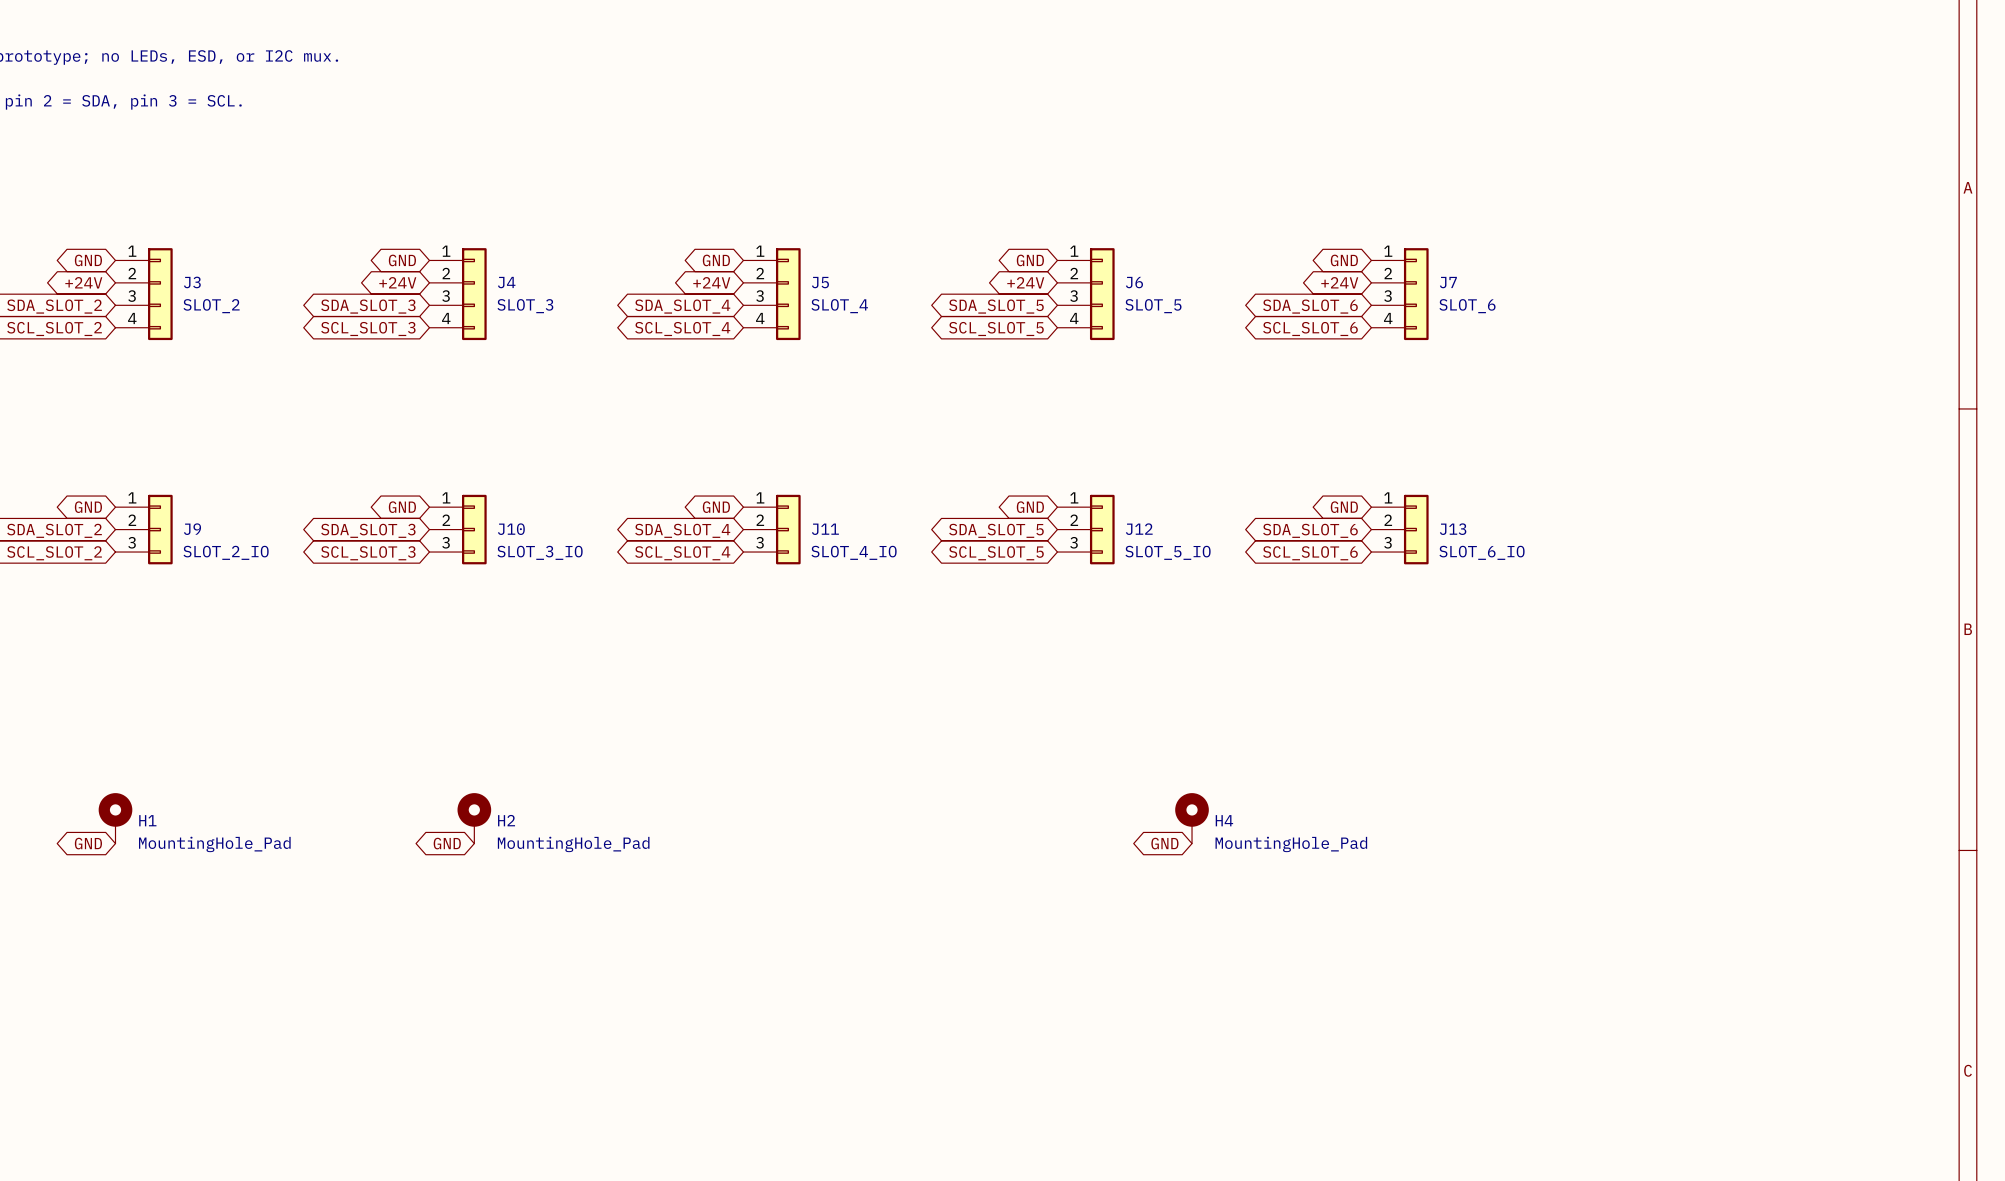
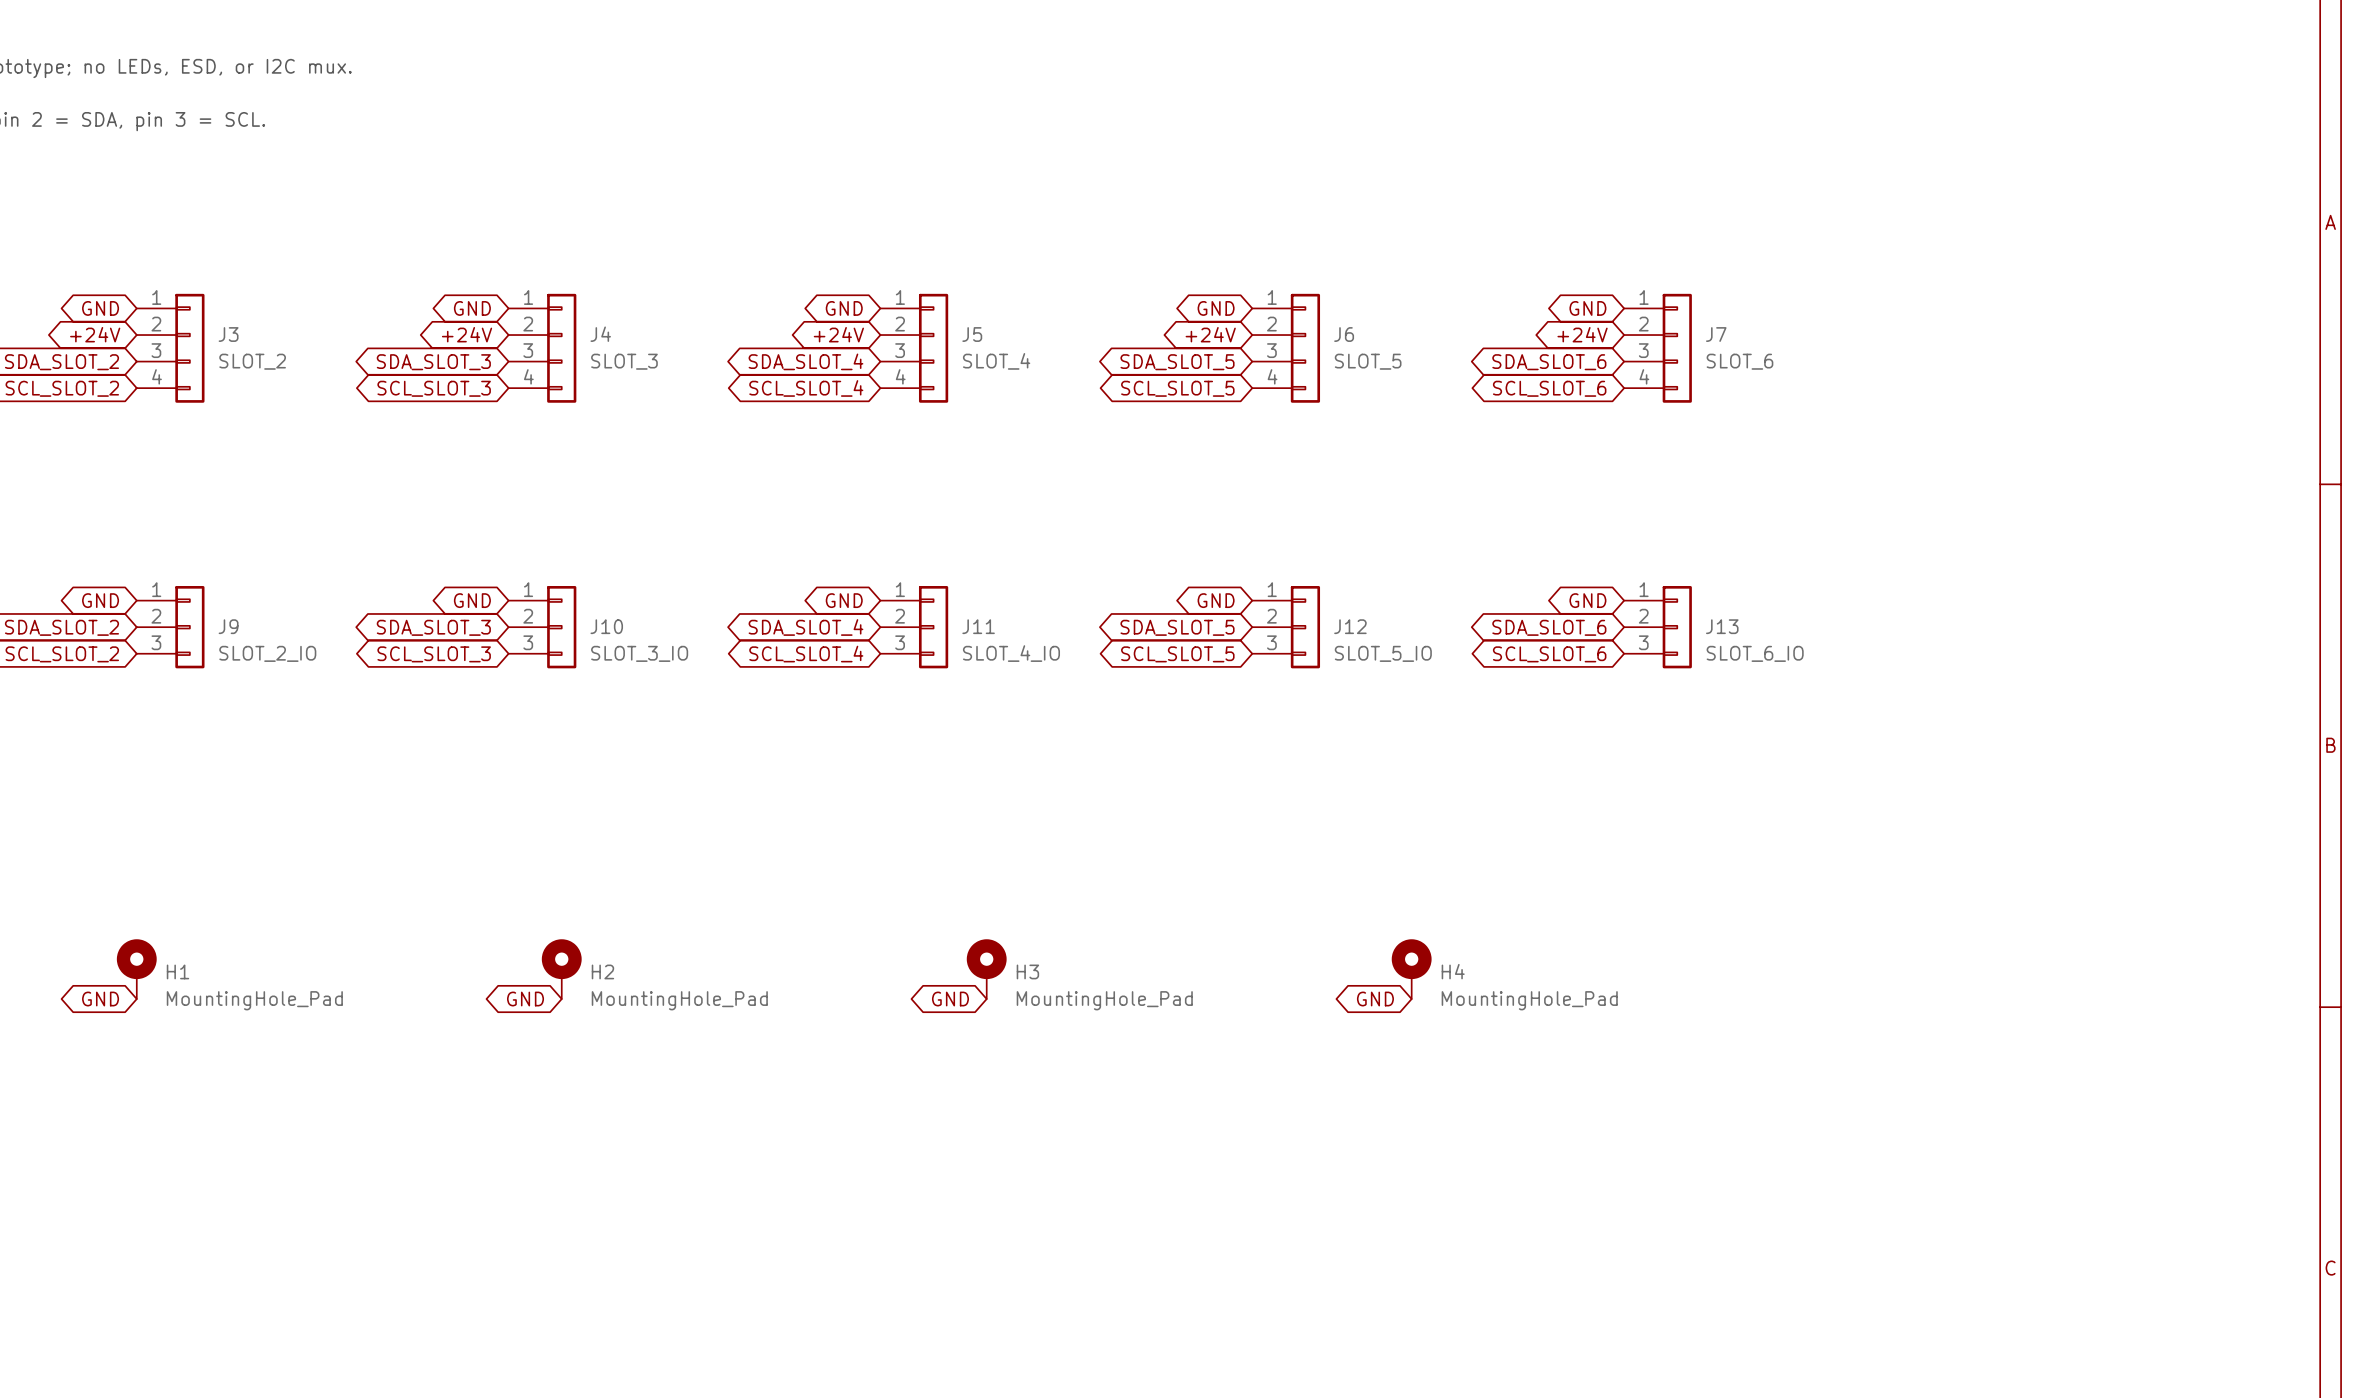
H3: none -> MountingHole_Pad (986, 969)
global label: none -> GND (950, 999)

